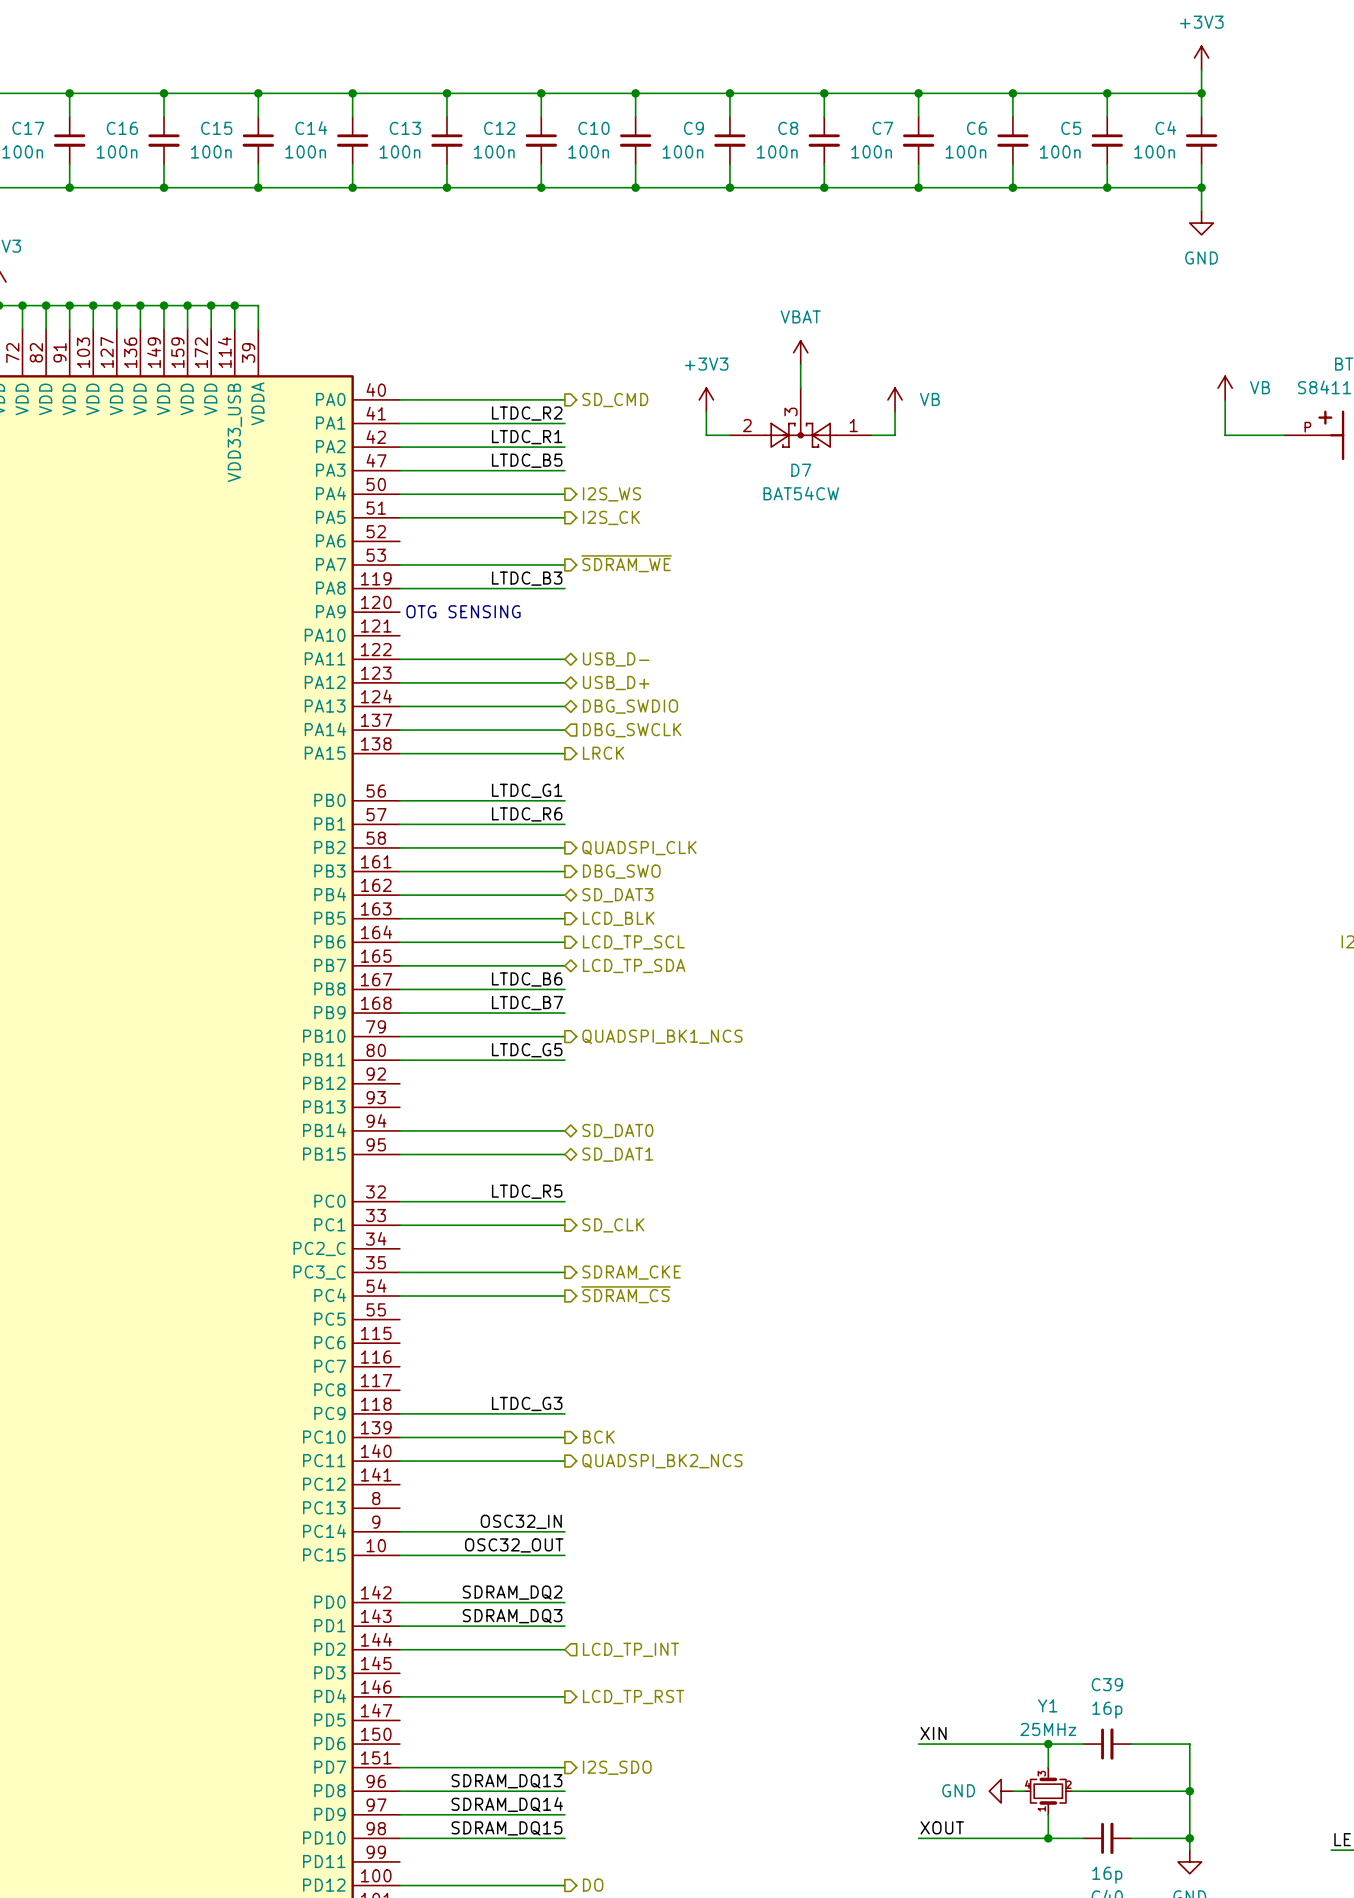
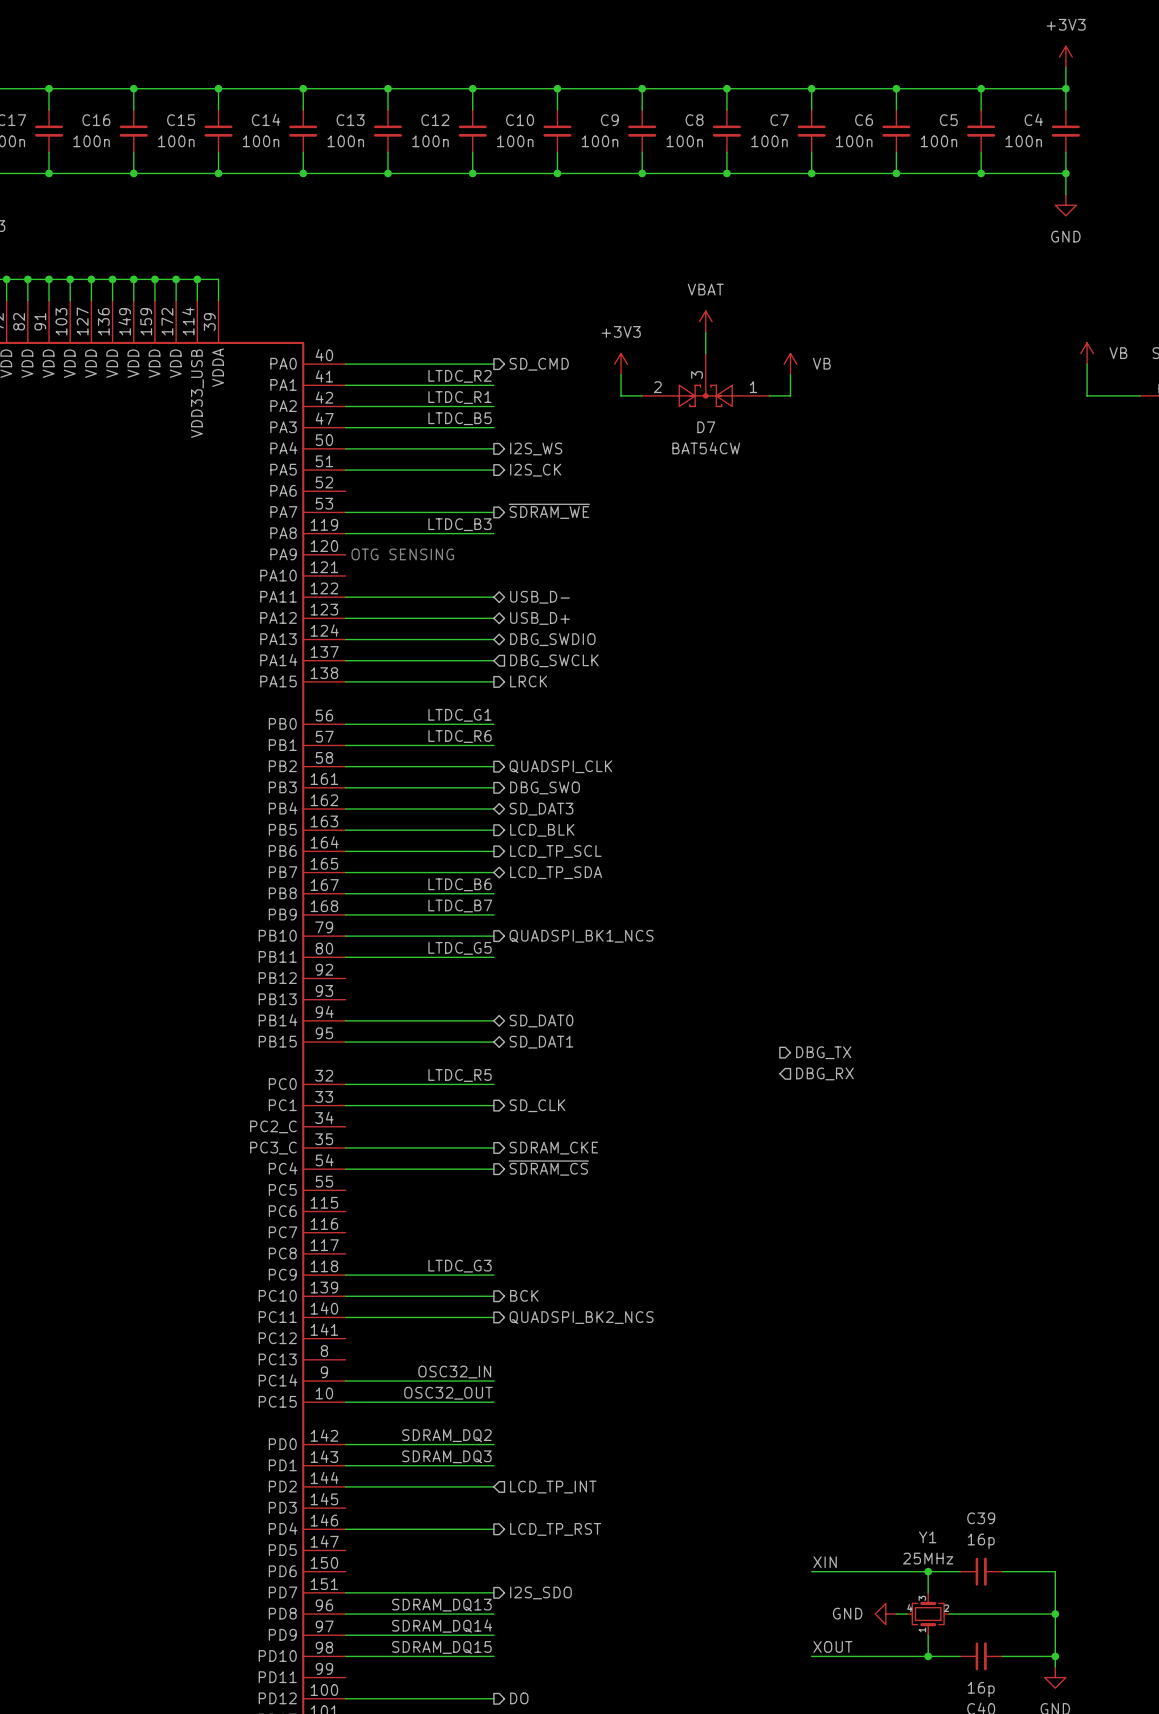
hierarchical label: none -> DBG_TX (823, 1052)
hierarchical label: none -> DBG_RX (824, 1073)

